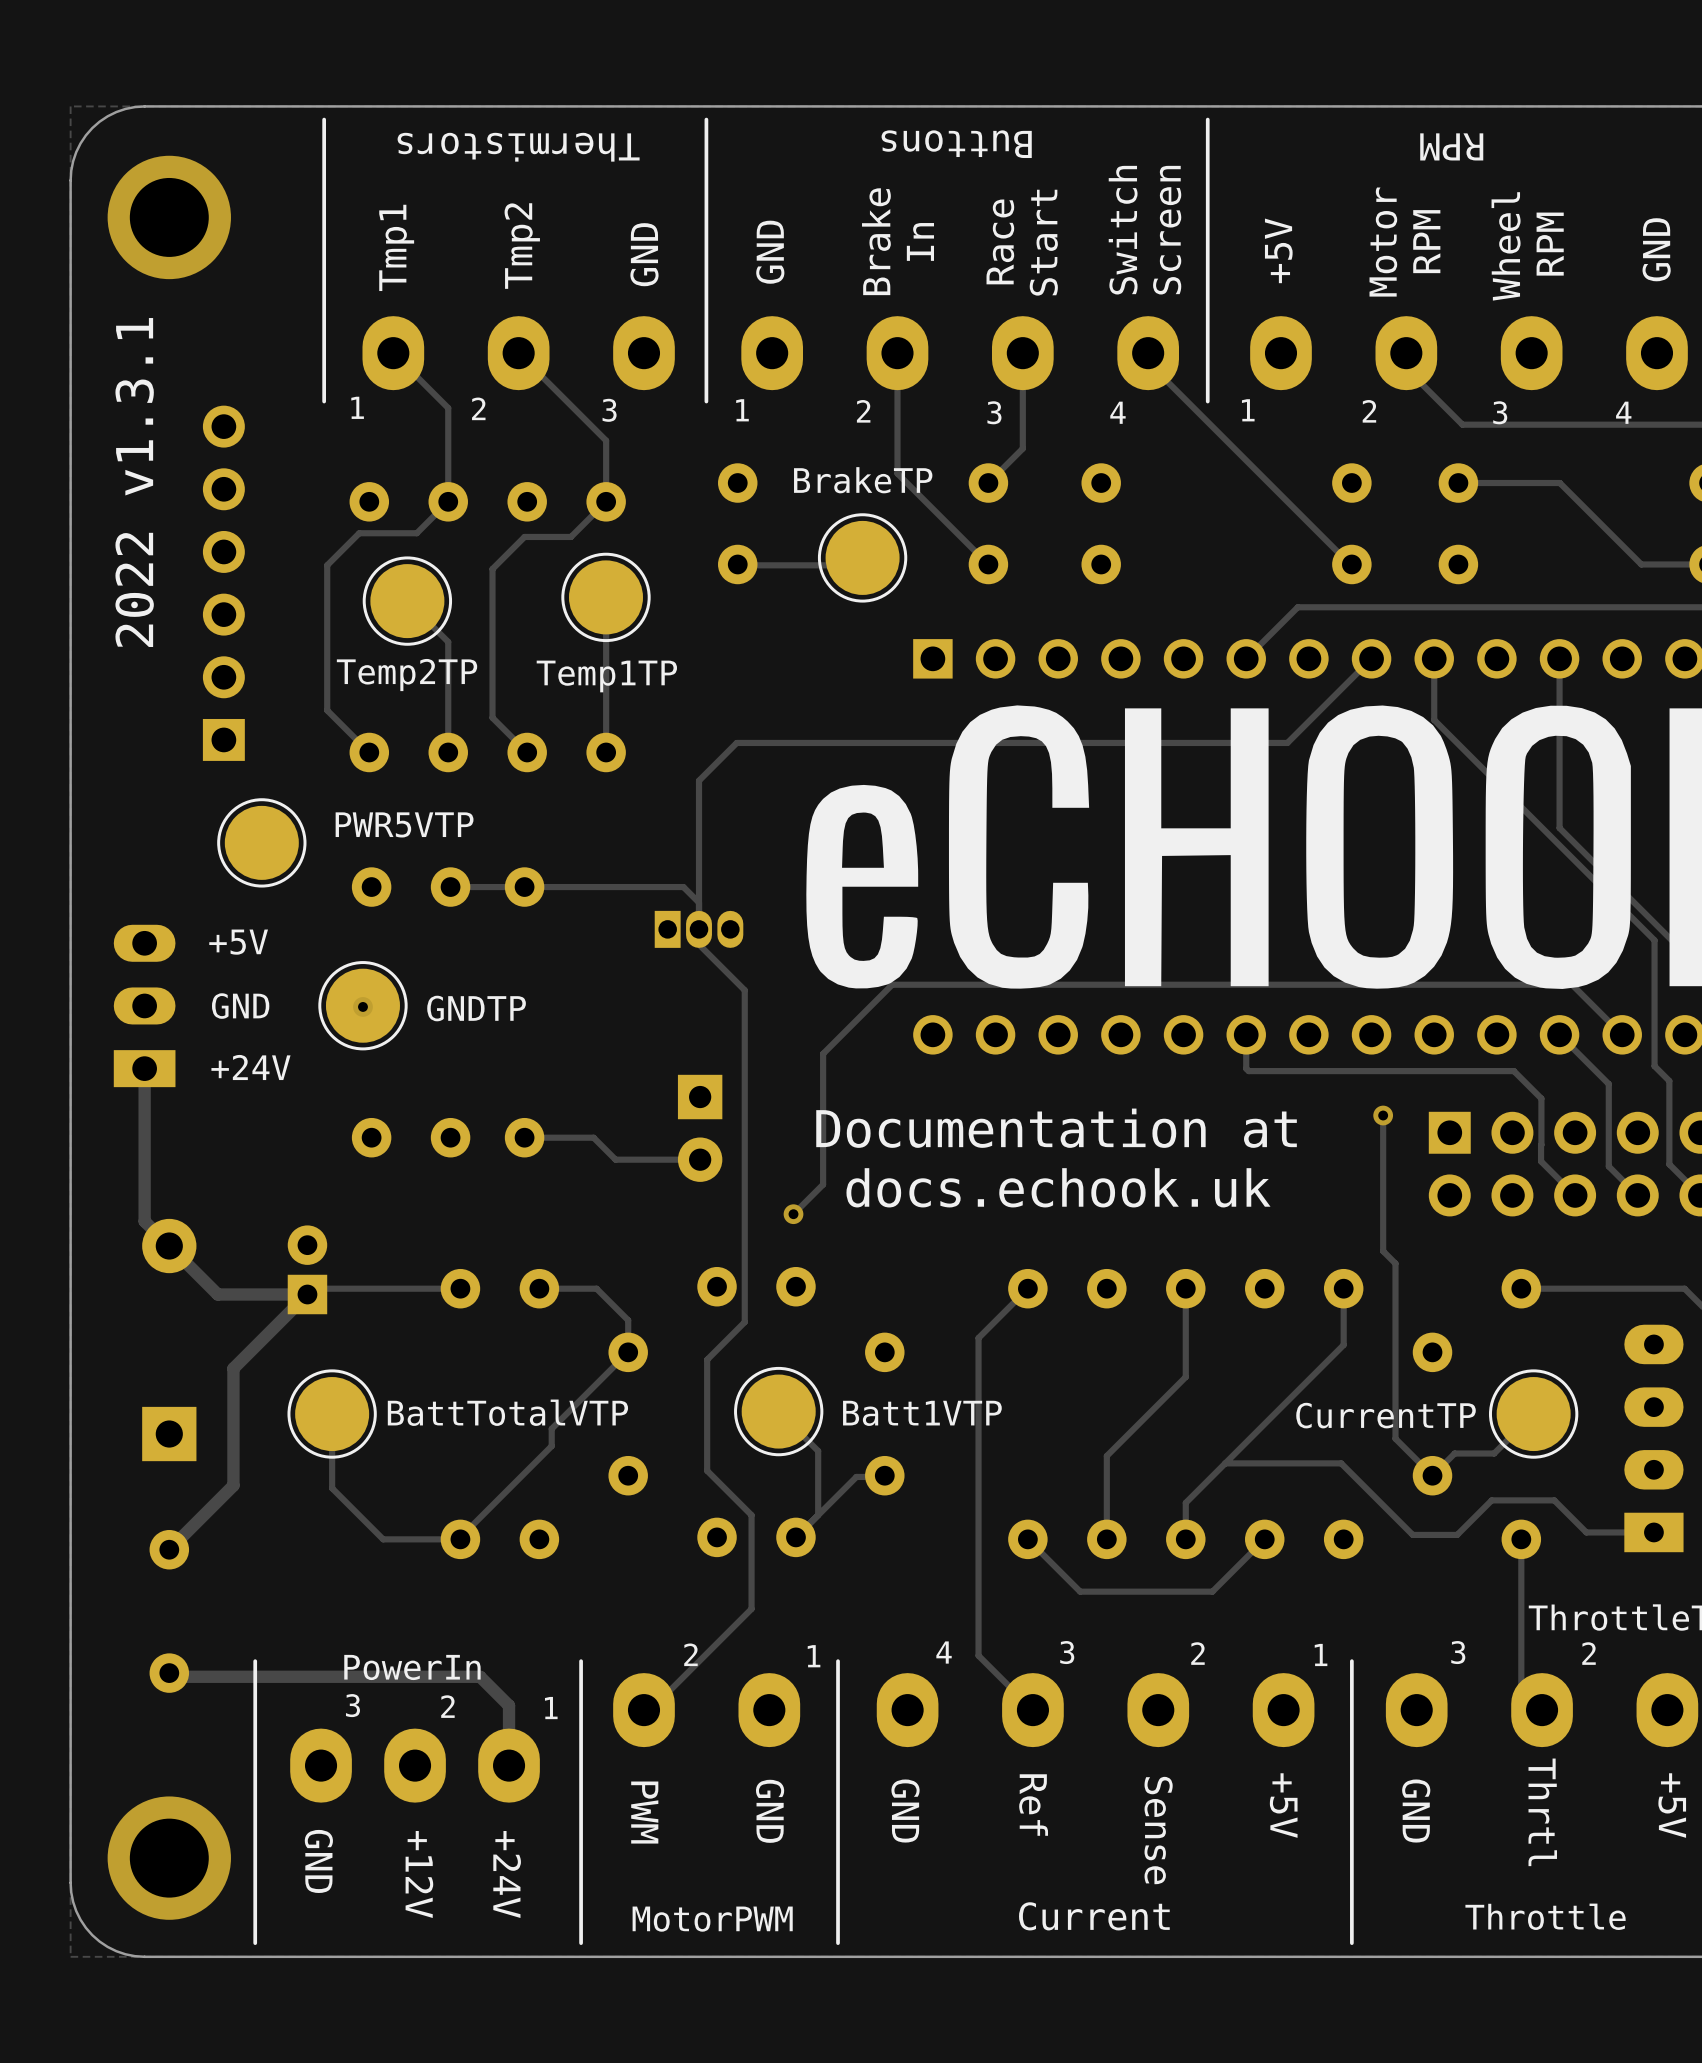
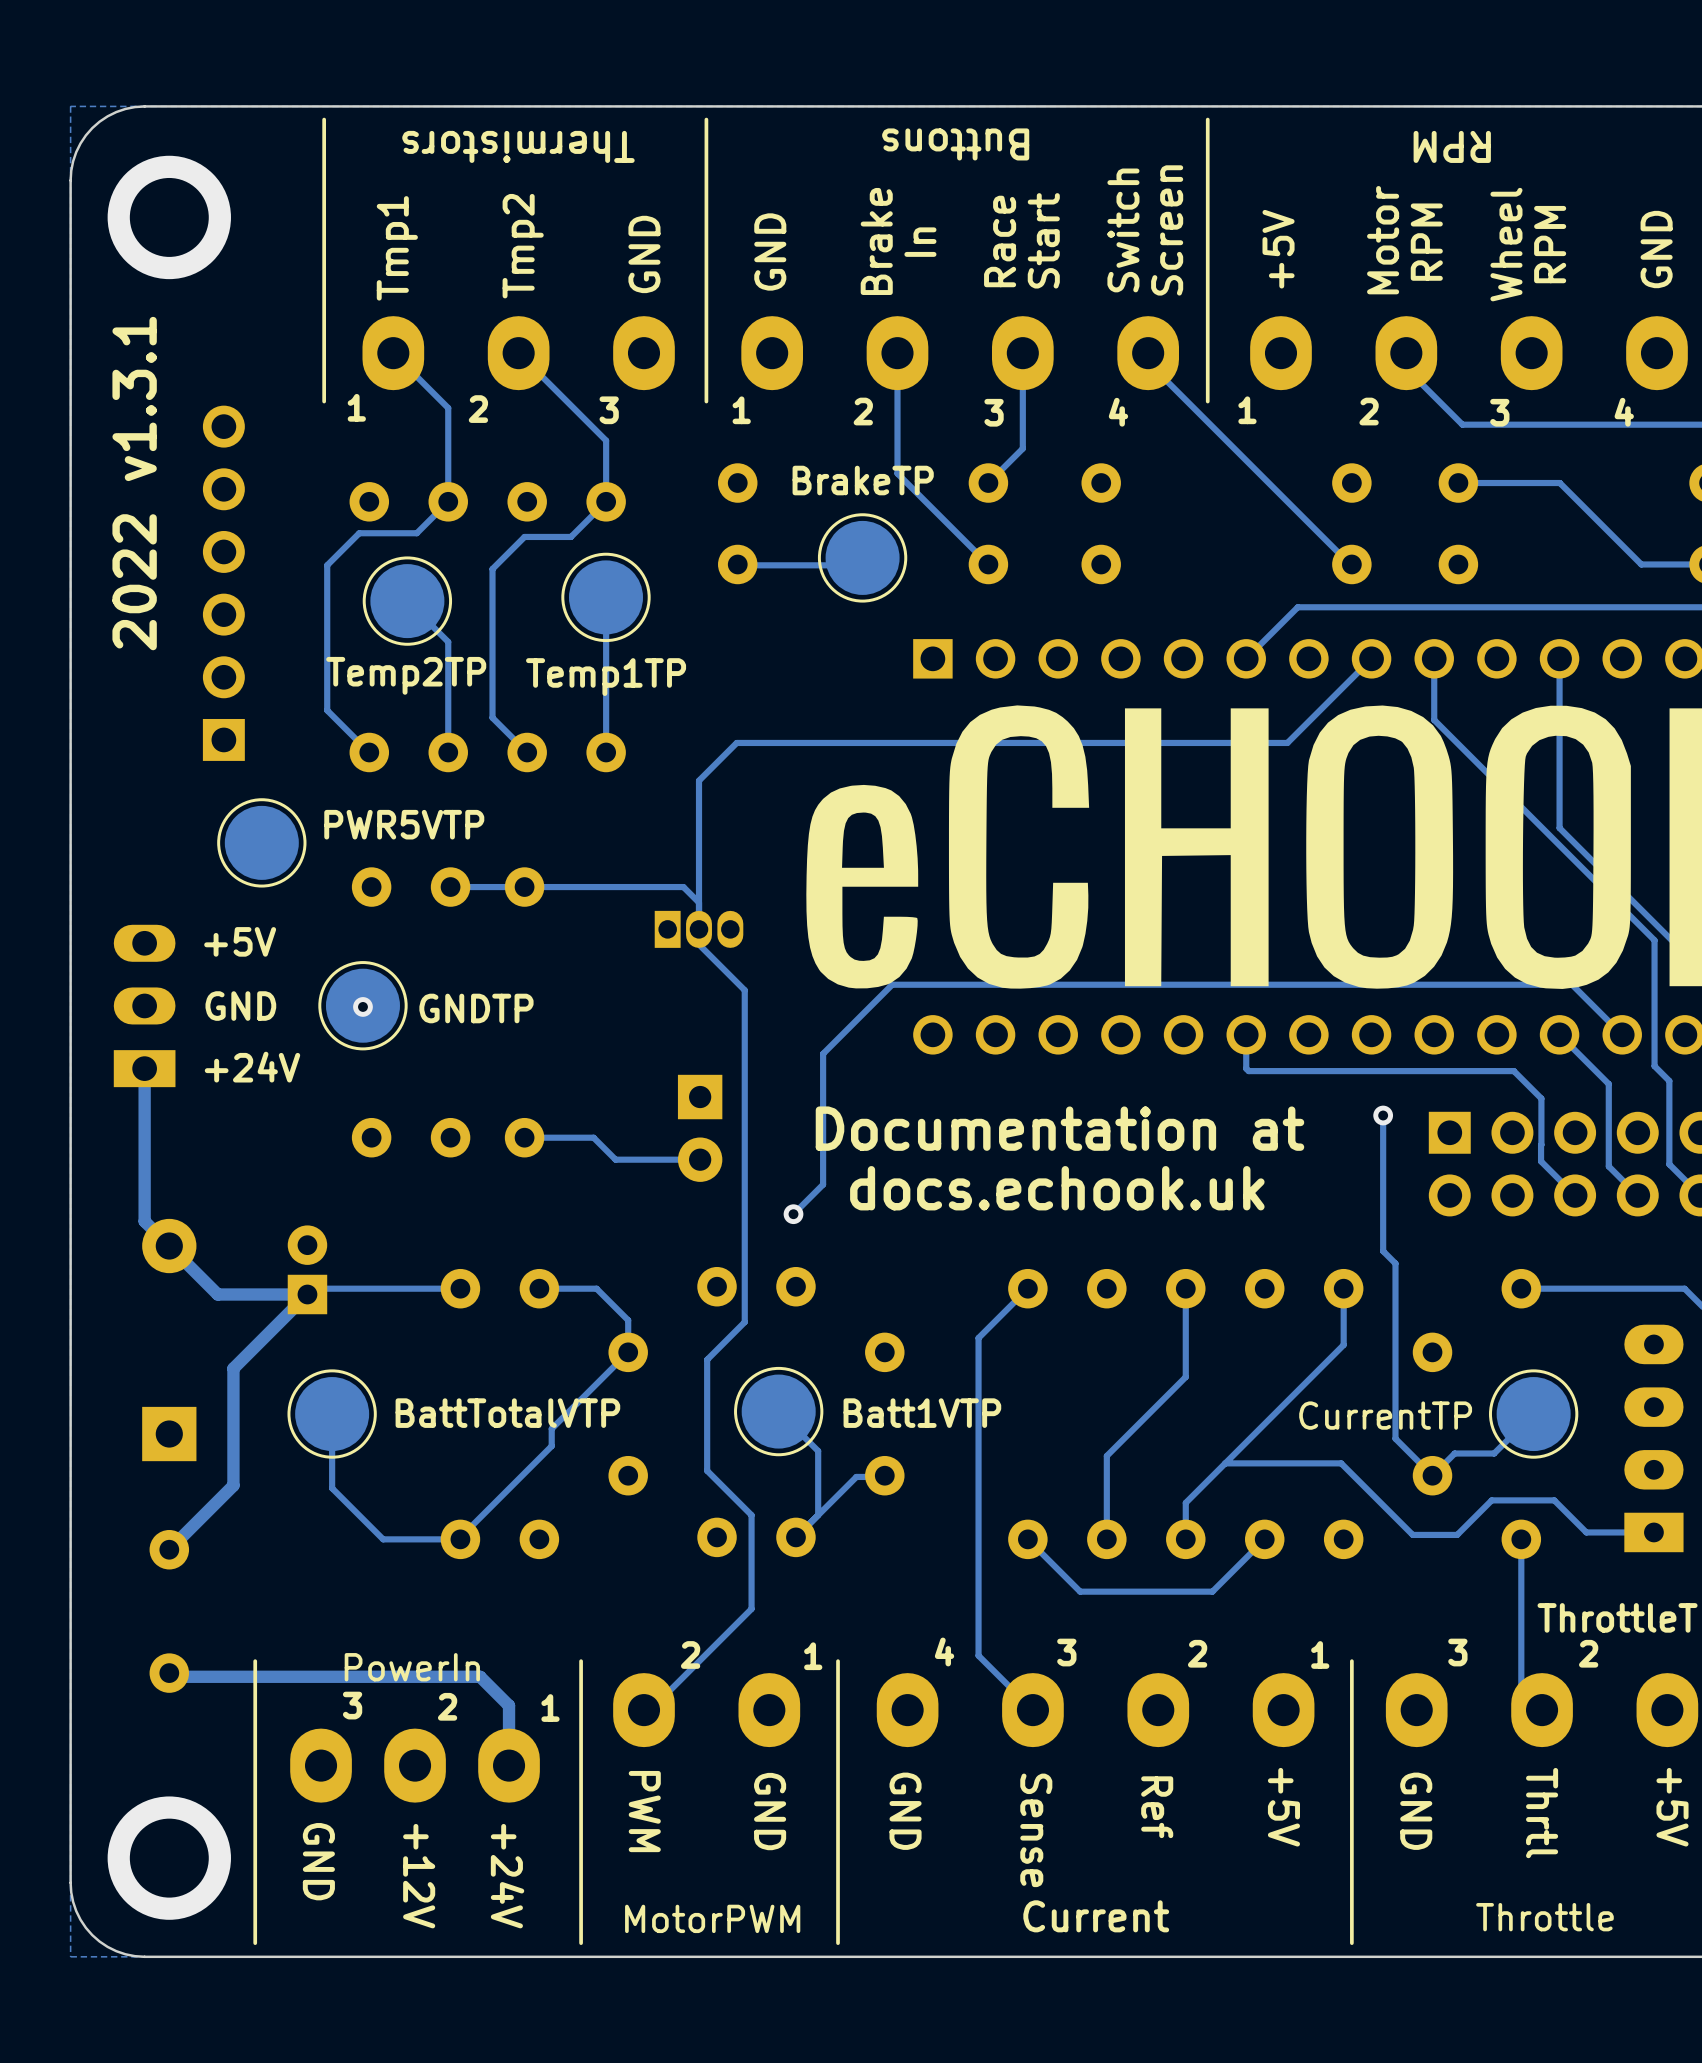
text position: Ref (1033, 1805) -> Ref (1157, 1807)
text position: Sense (1158, 1830) -> Sense (1036, 1830)

